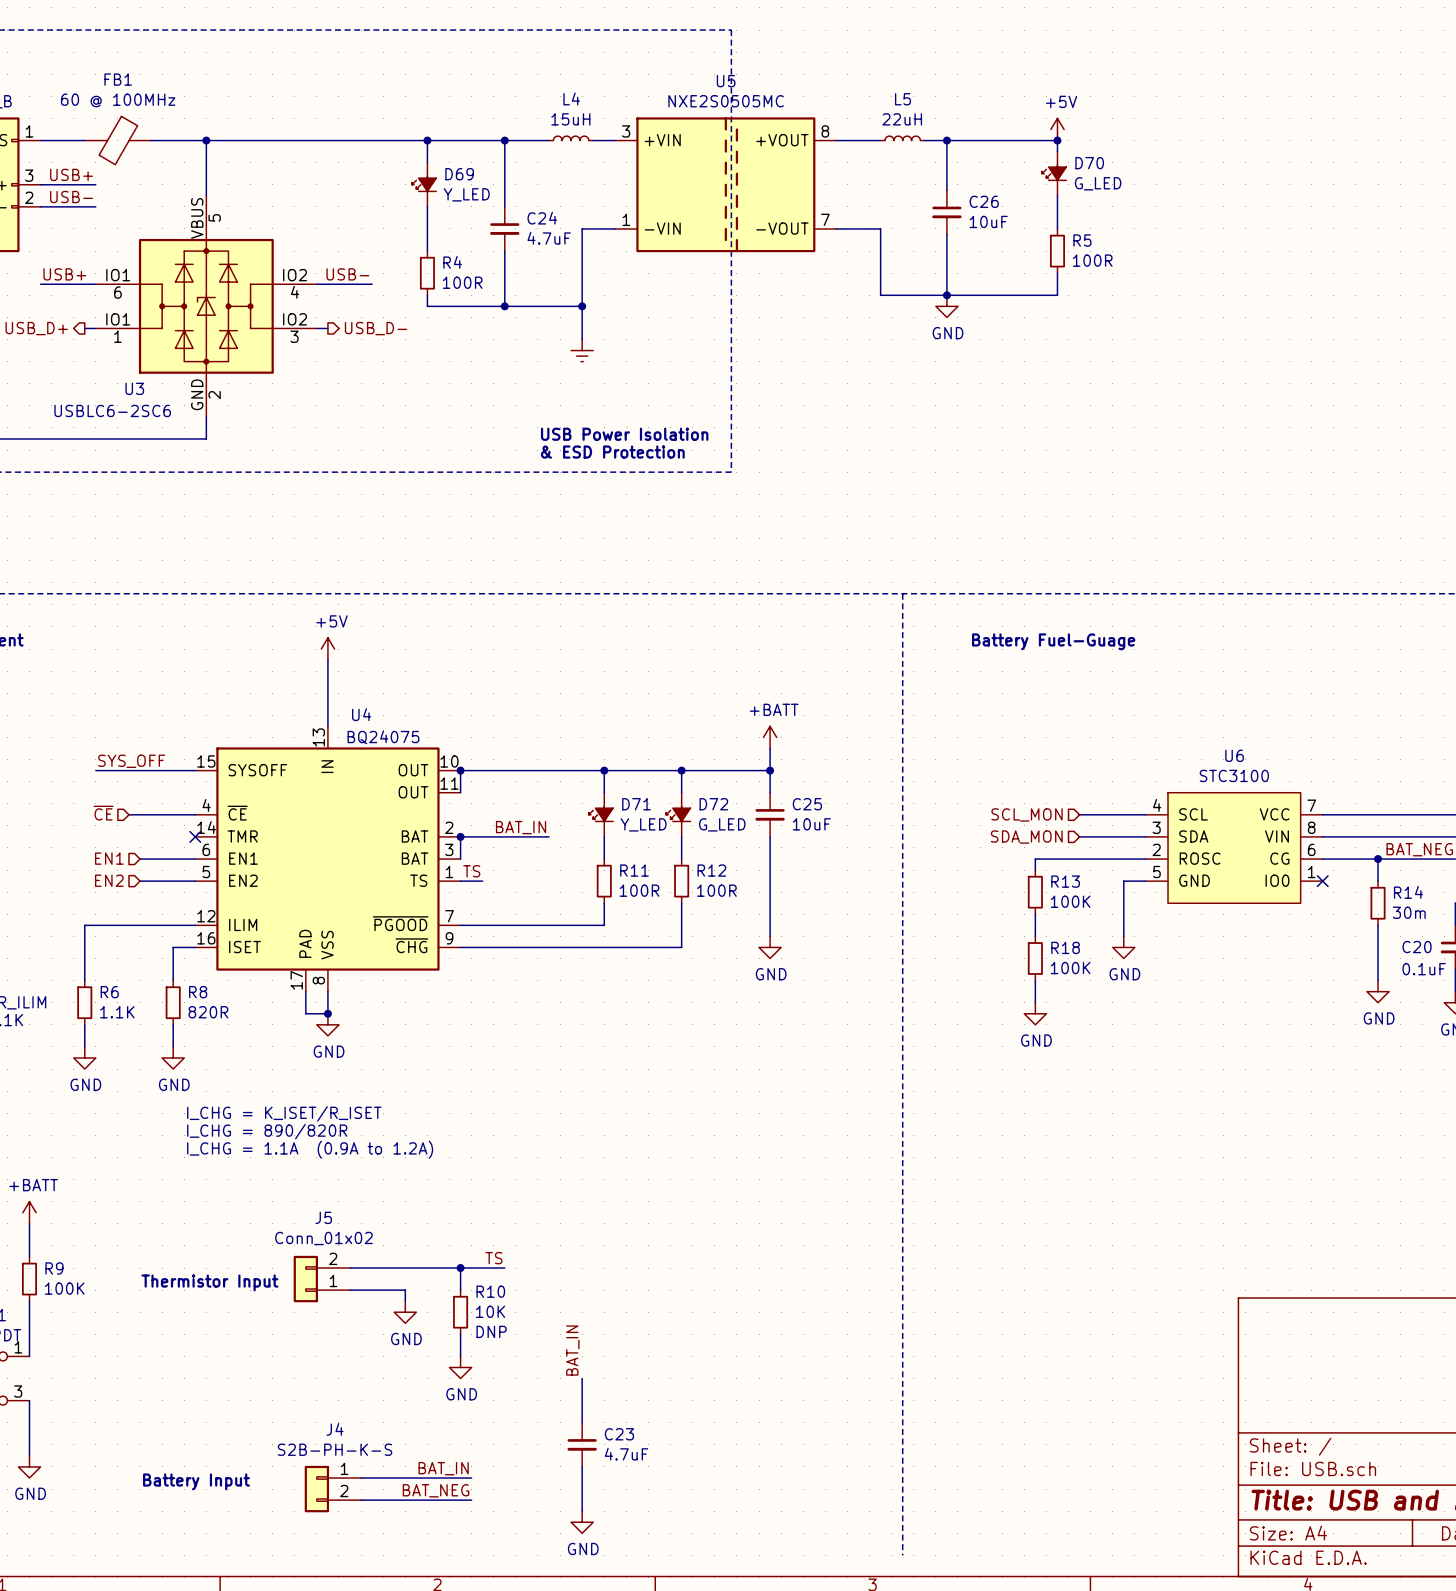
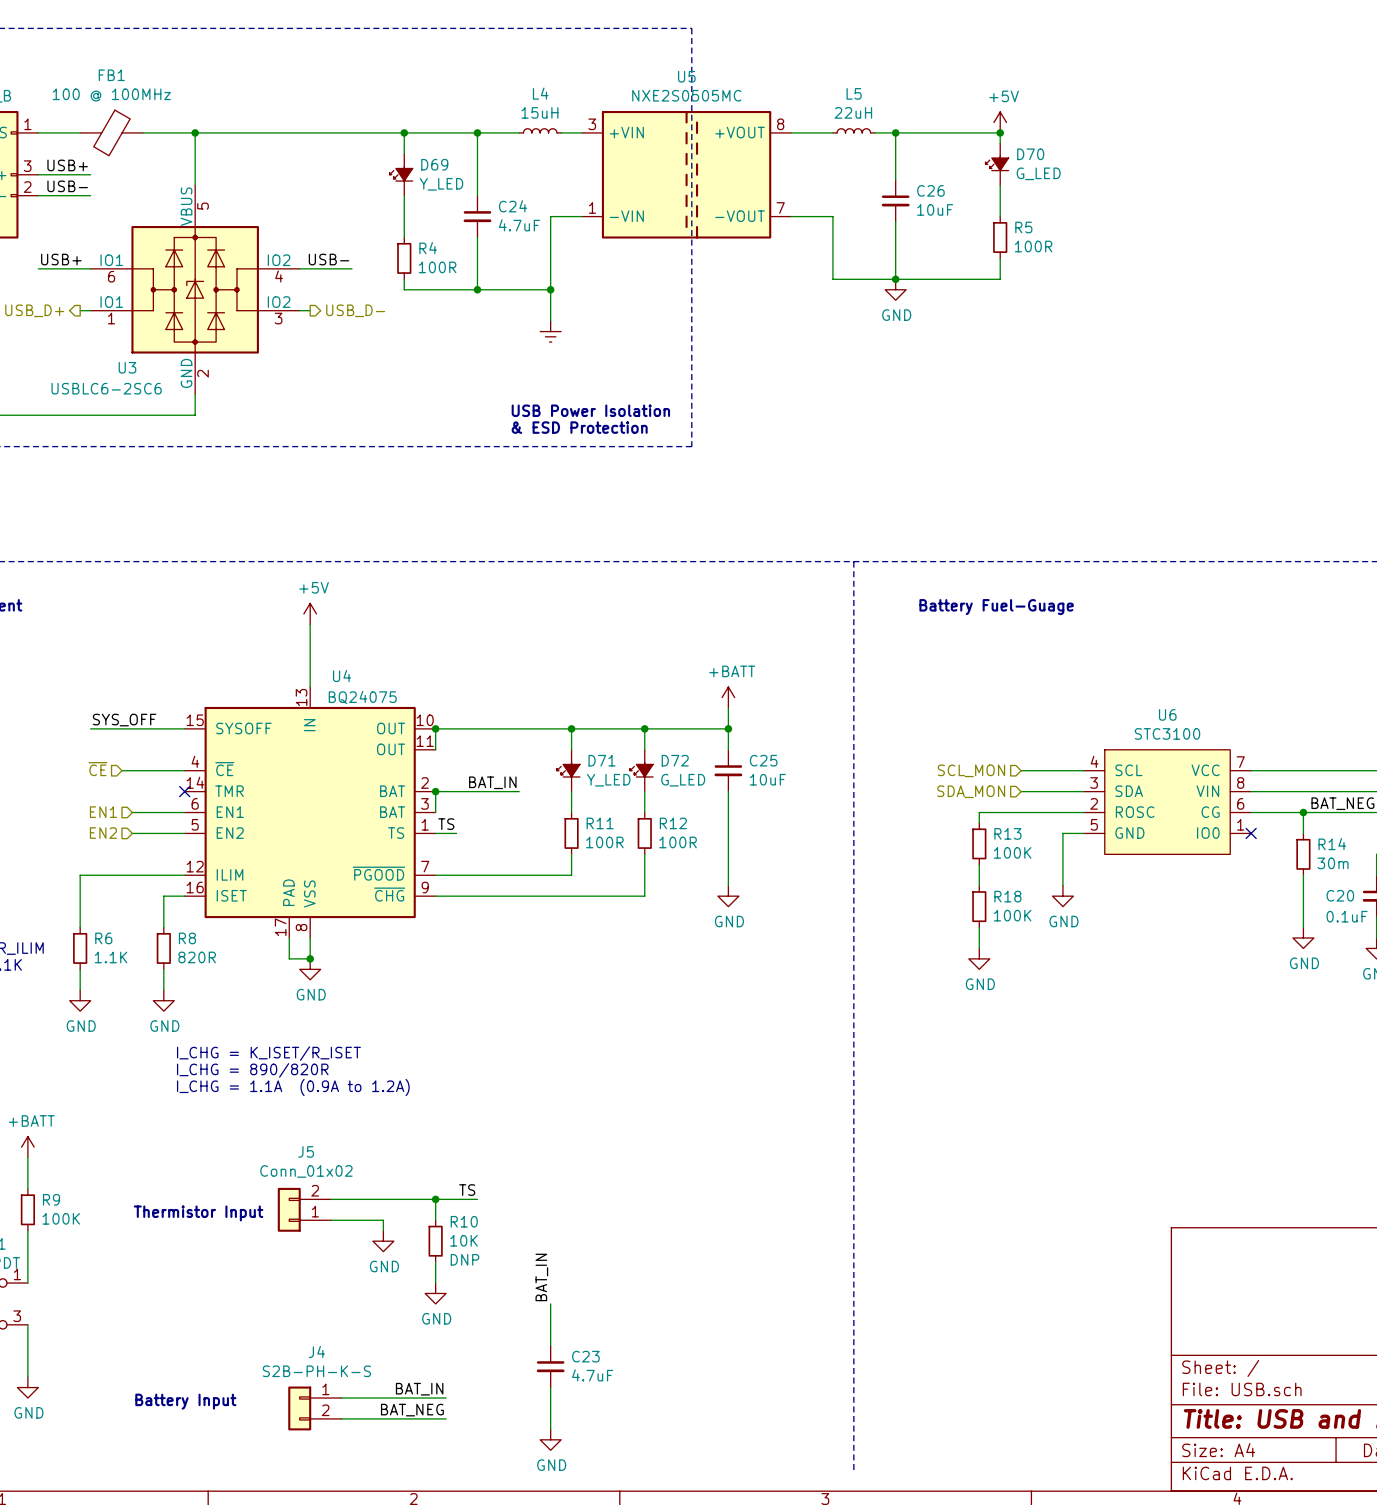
FB1 value: 60 @ 100MHz (118, 100) -> 100 @ 100MHz (111, 95)

